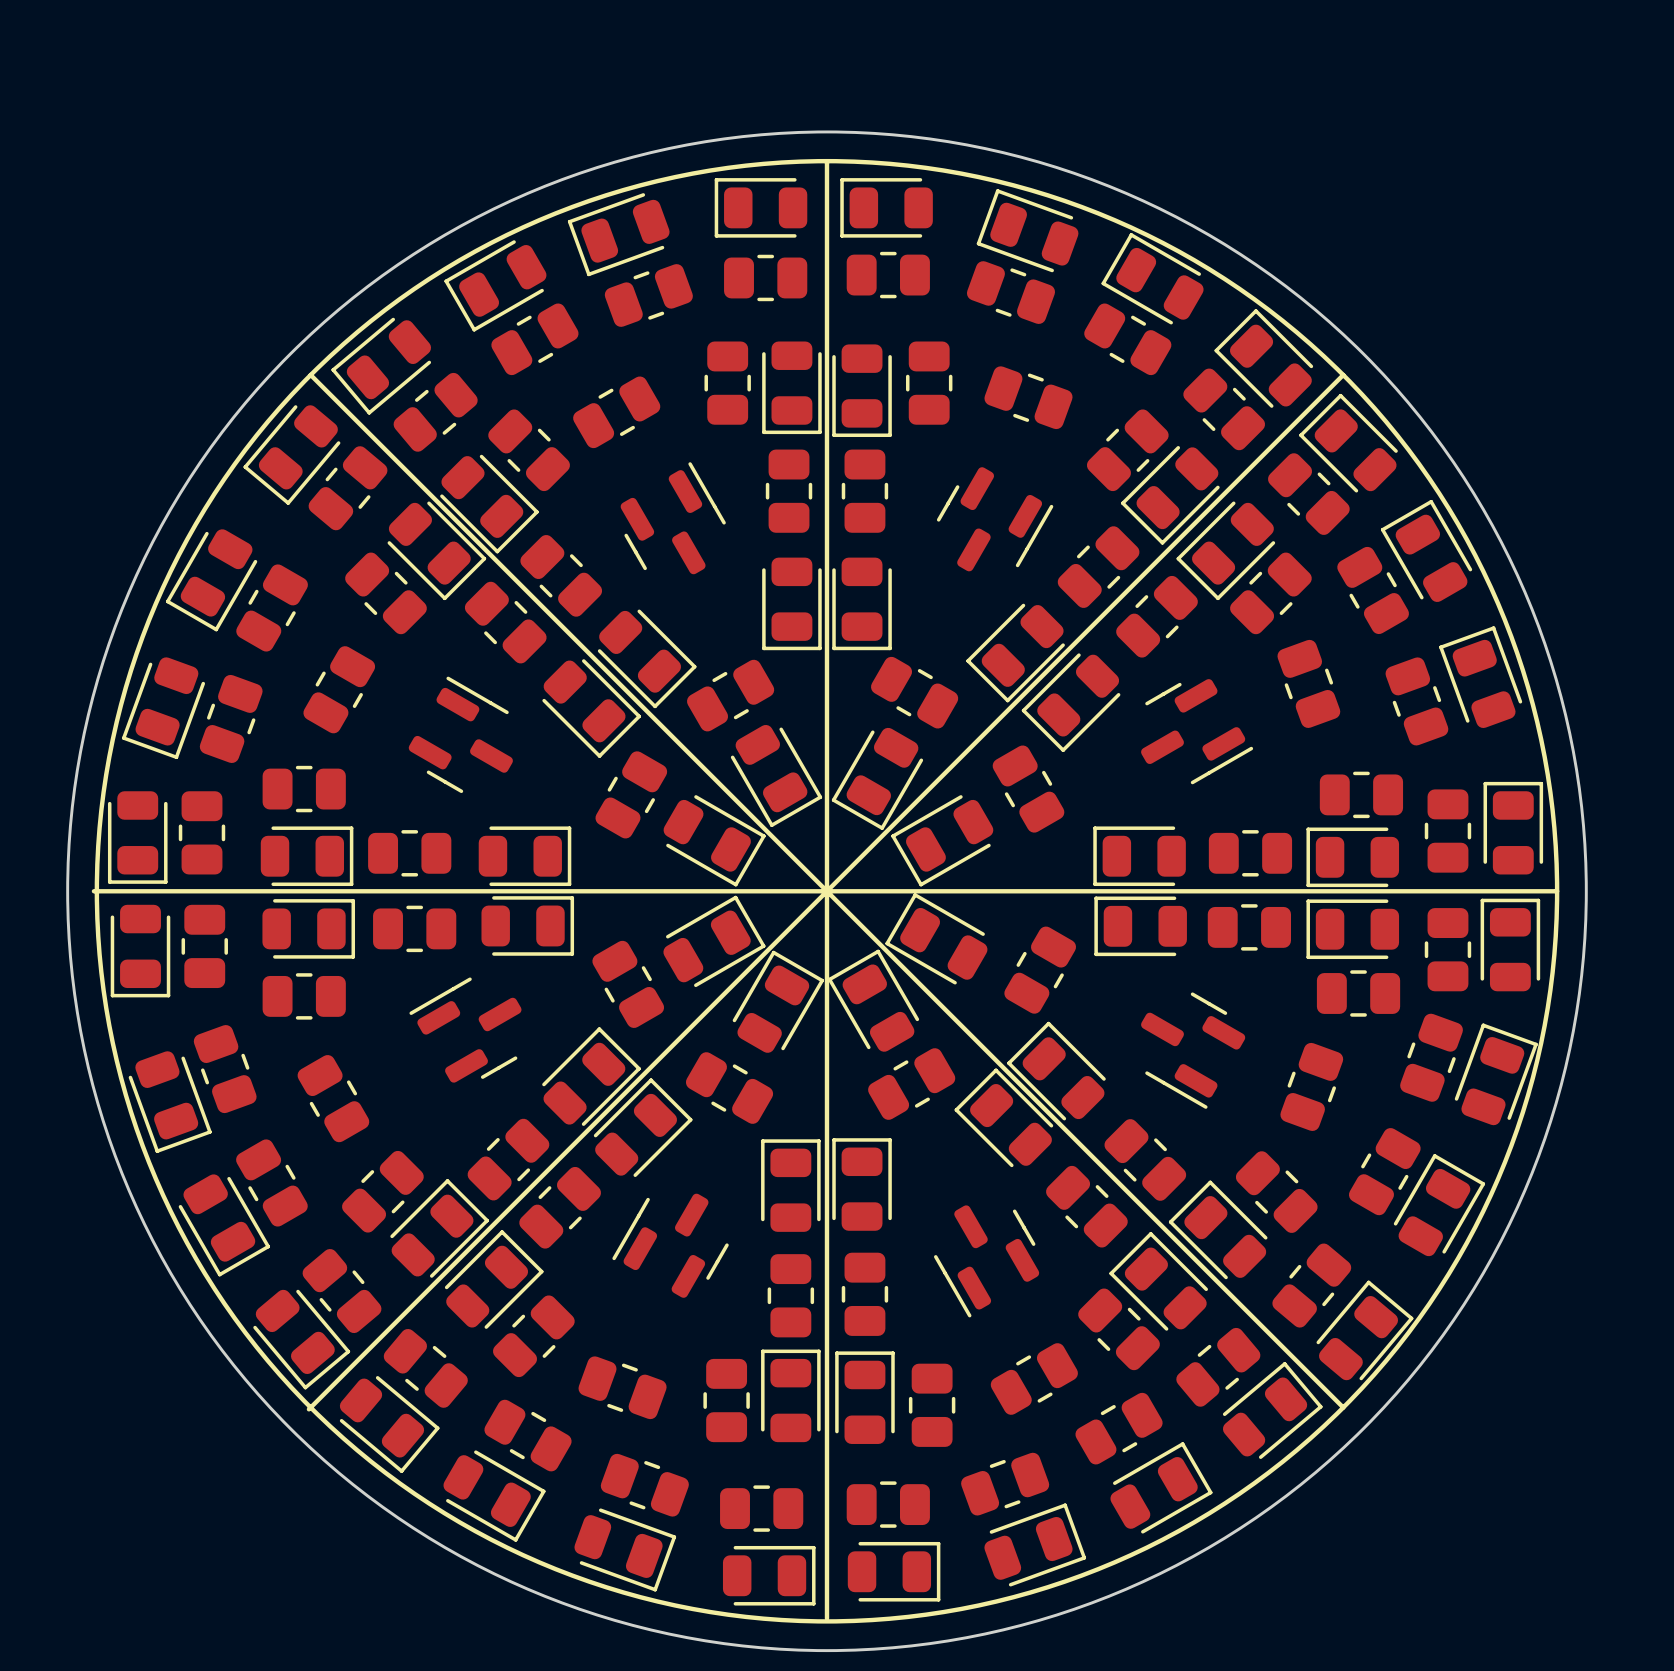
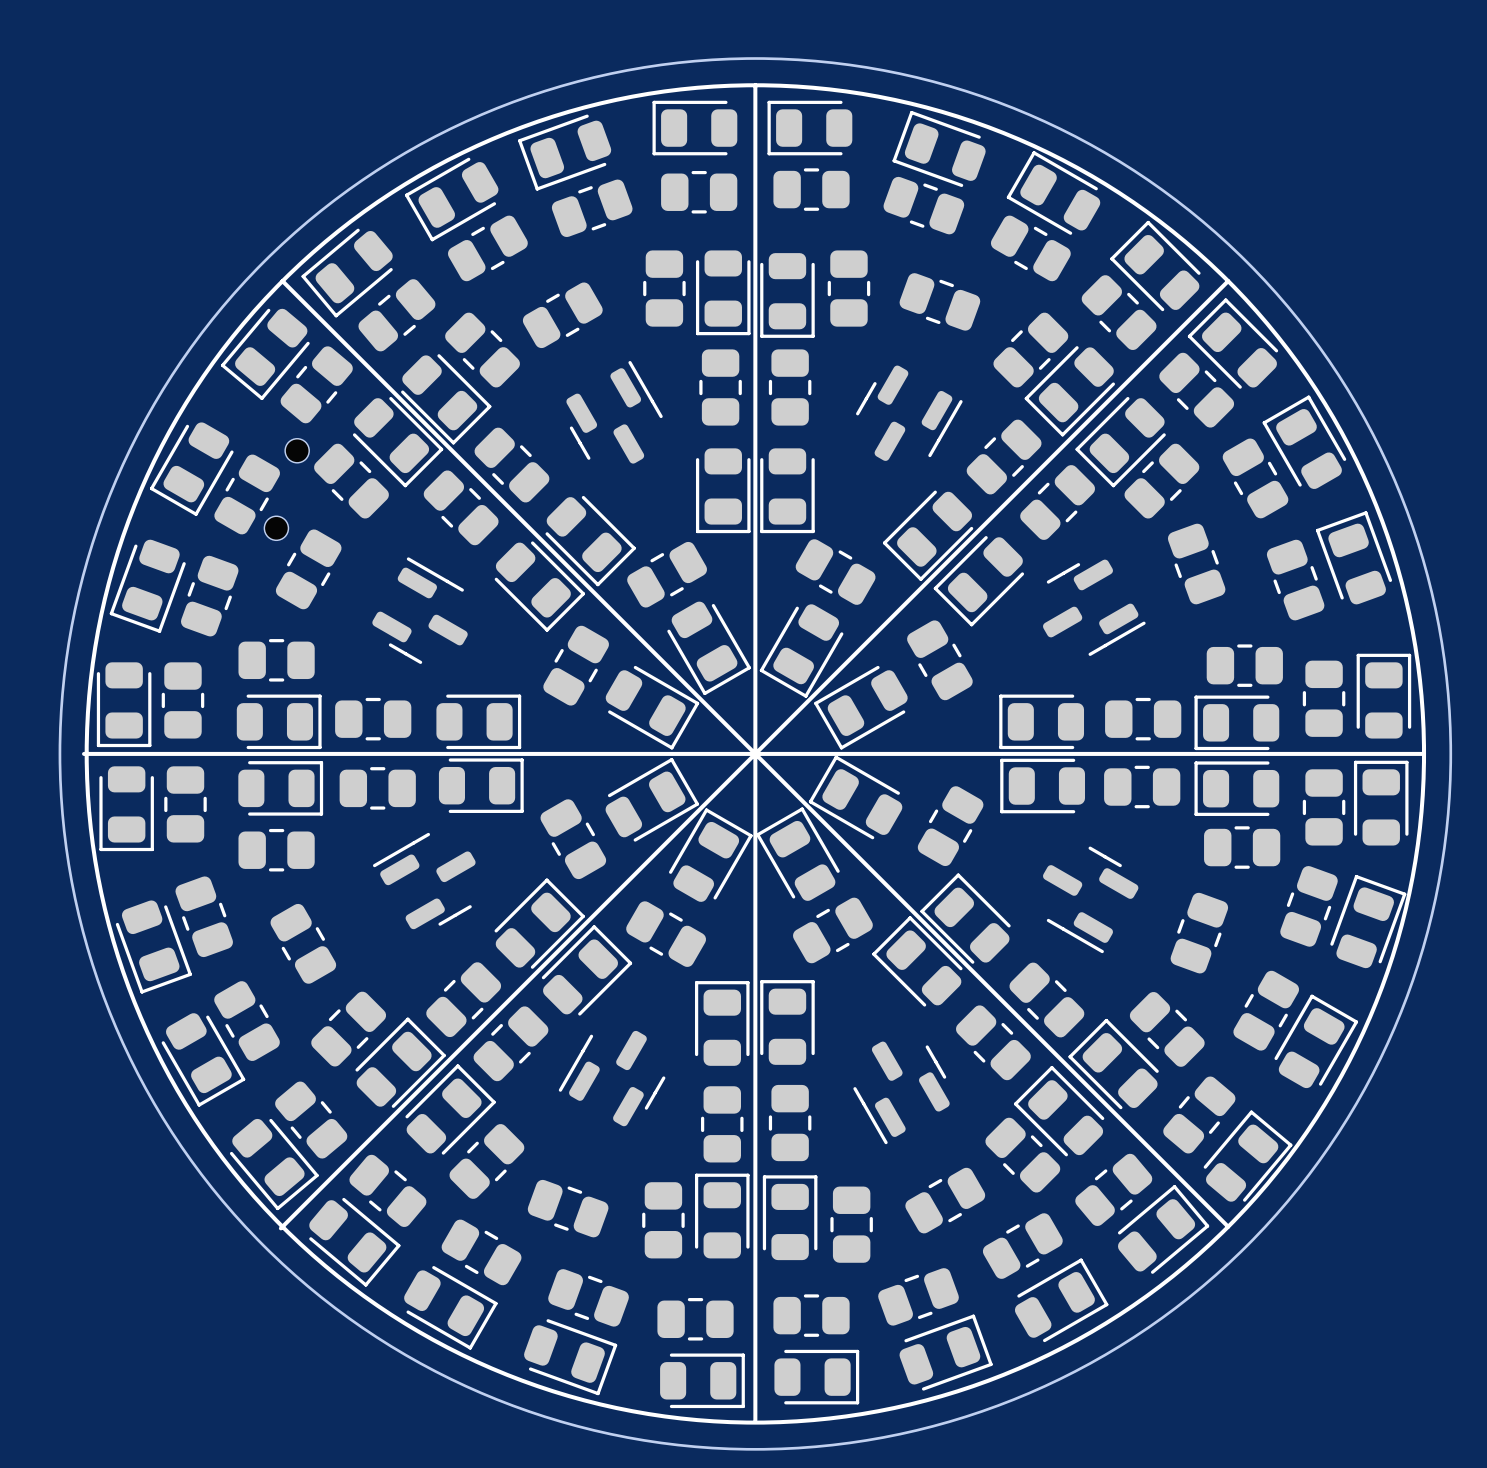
part: none -> (286, 489)

